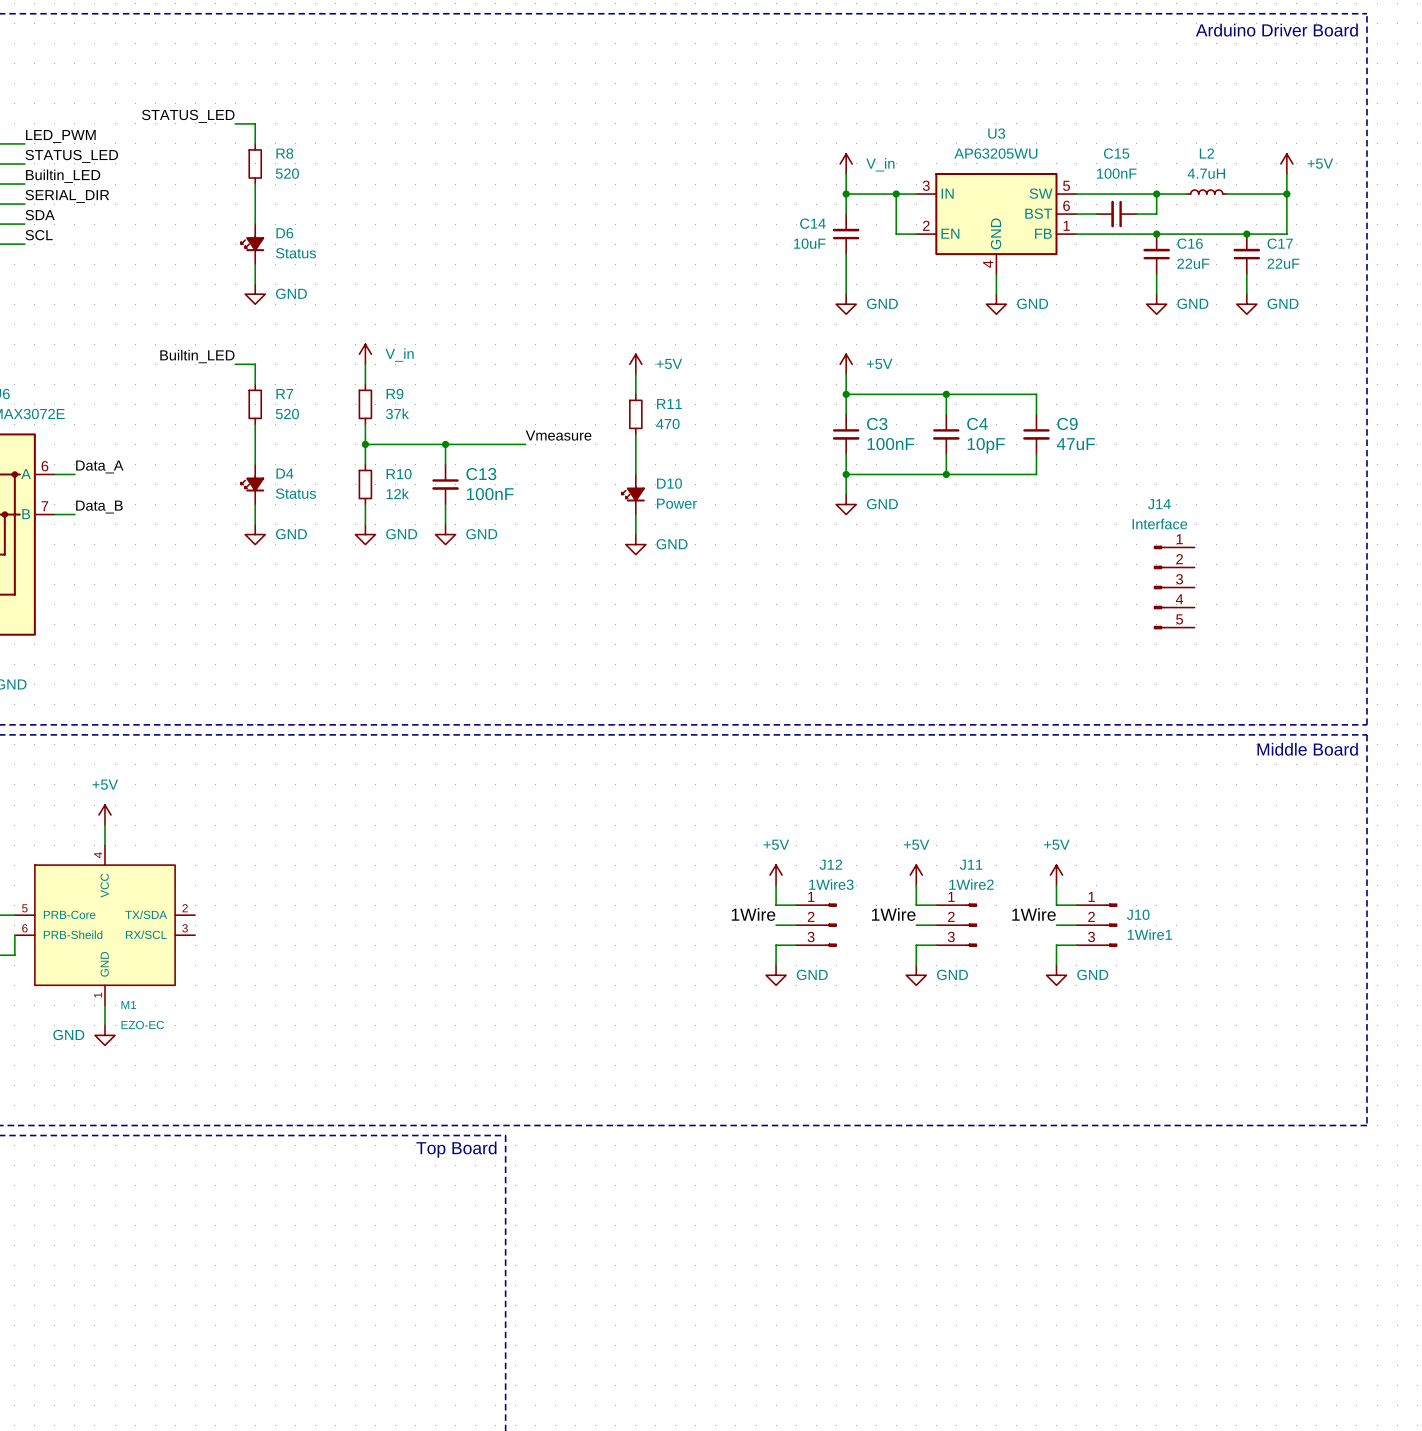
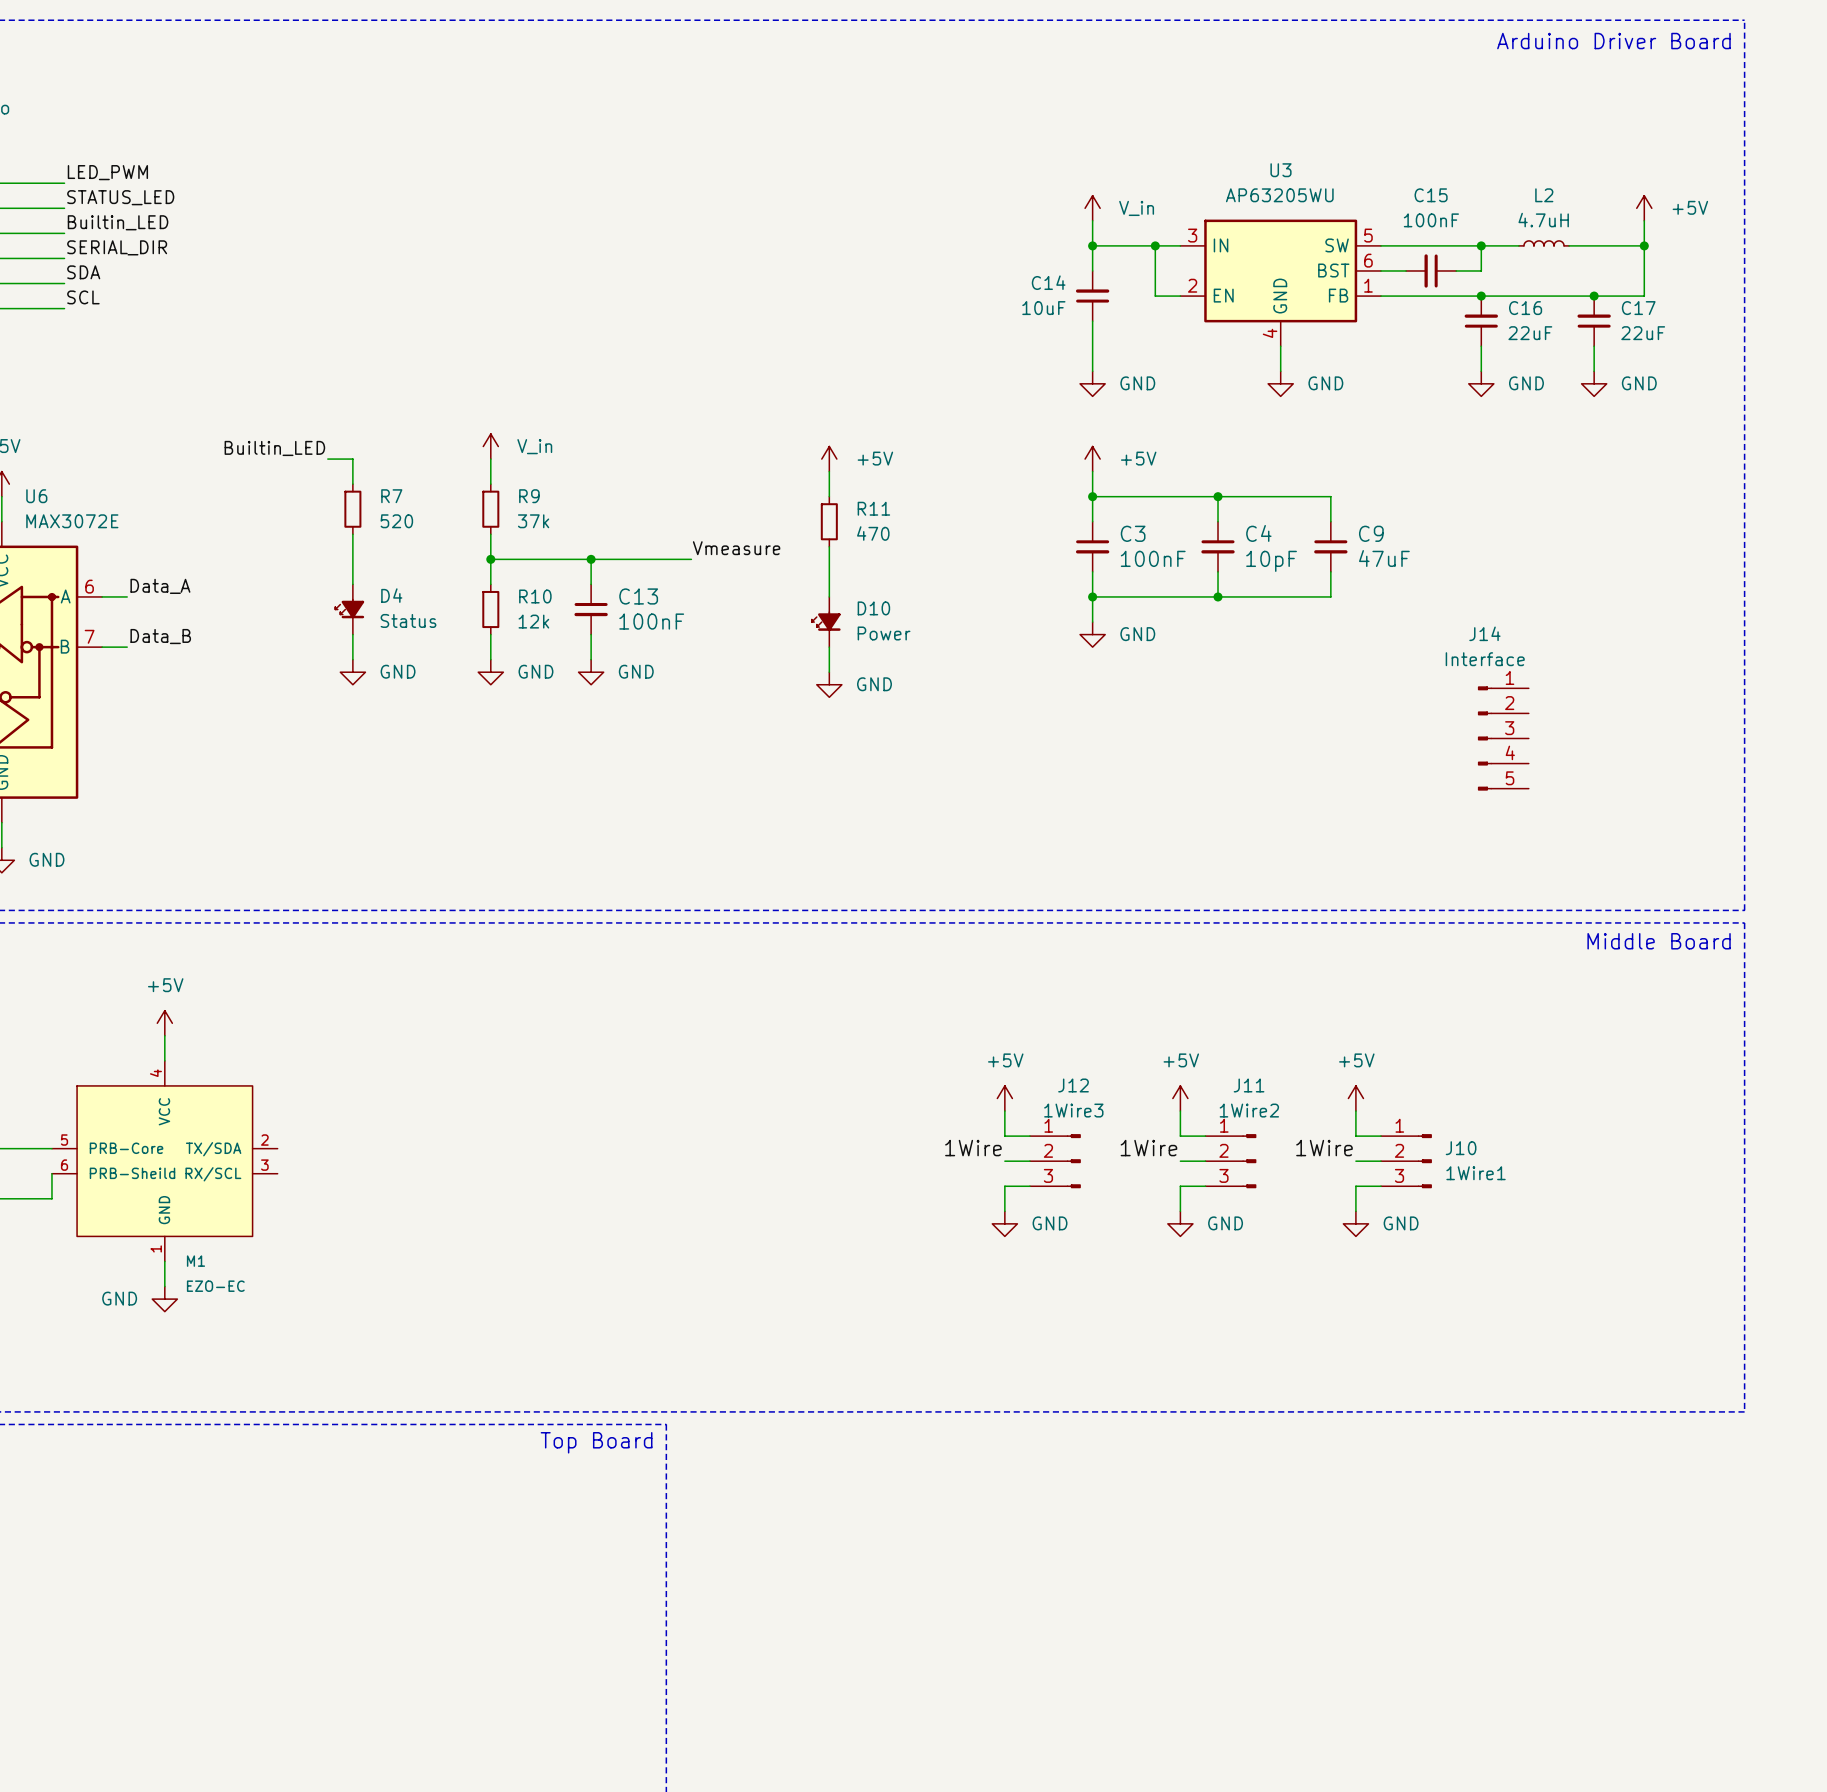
label: STATUS_LED (188, 116) -> none
wire: (235, 123) (255, 123) (255, 143) -> none
R8: 520 (255, 163) -> none
wire: (255, 184) (255, 224) -> none
D6: Status (252, 244) -> none
wire: (255, 264) (255, 284) -> none
power symbol: GND (255, 294) -> none

